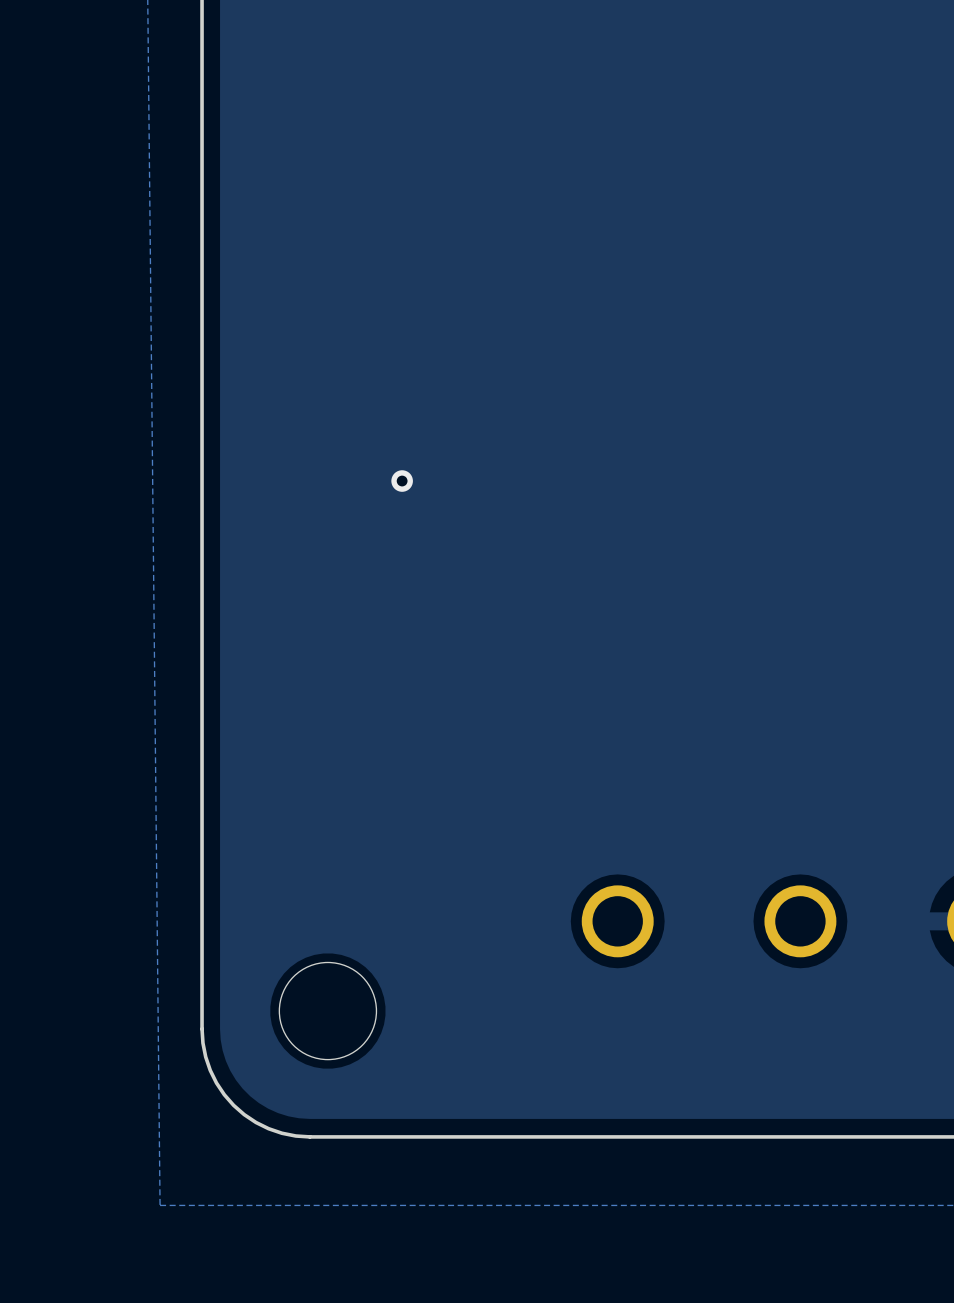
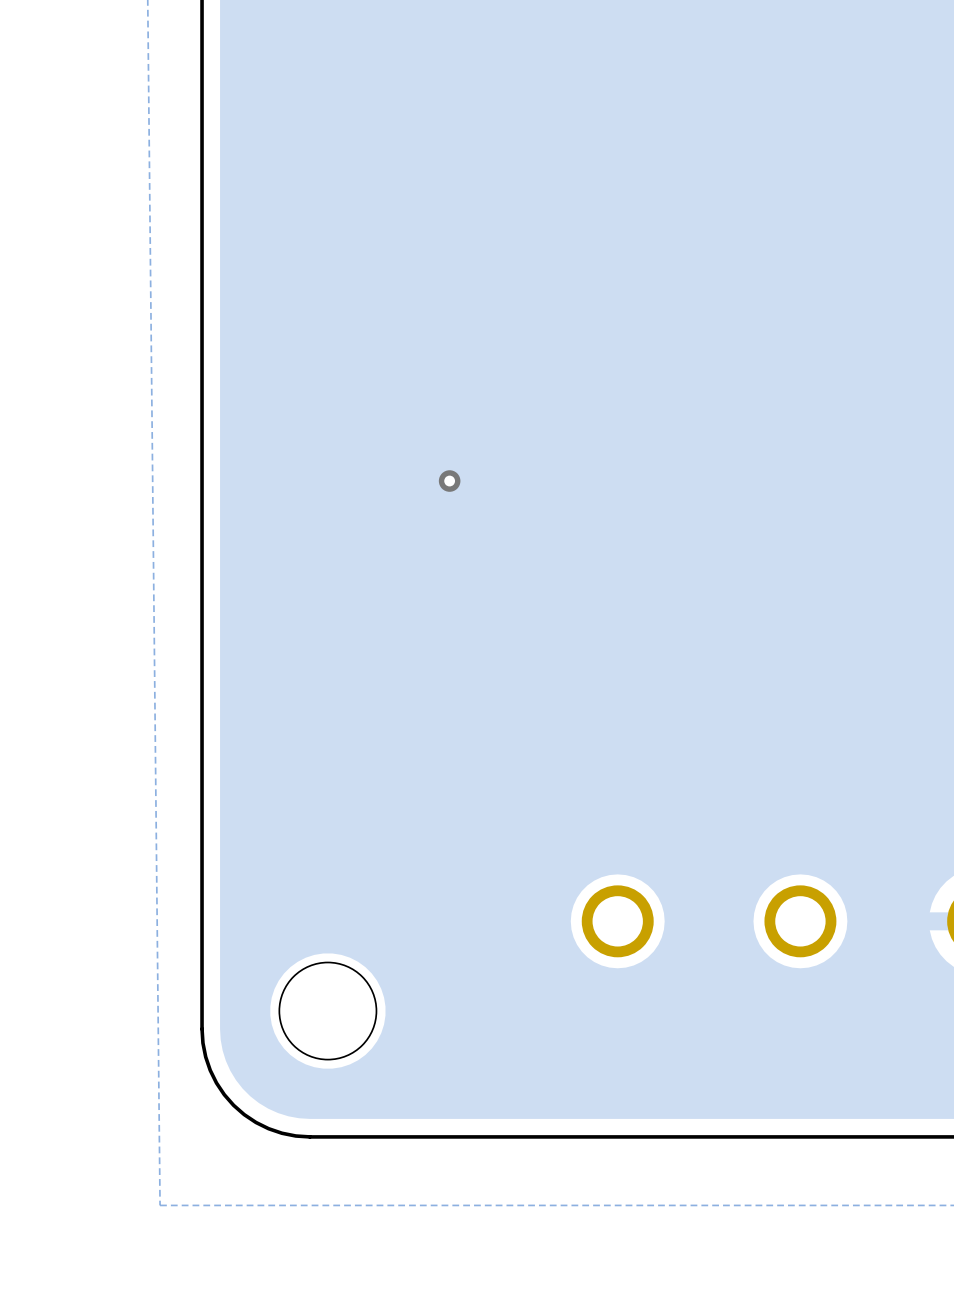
via position: (402, 481) -> (449, 481)

